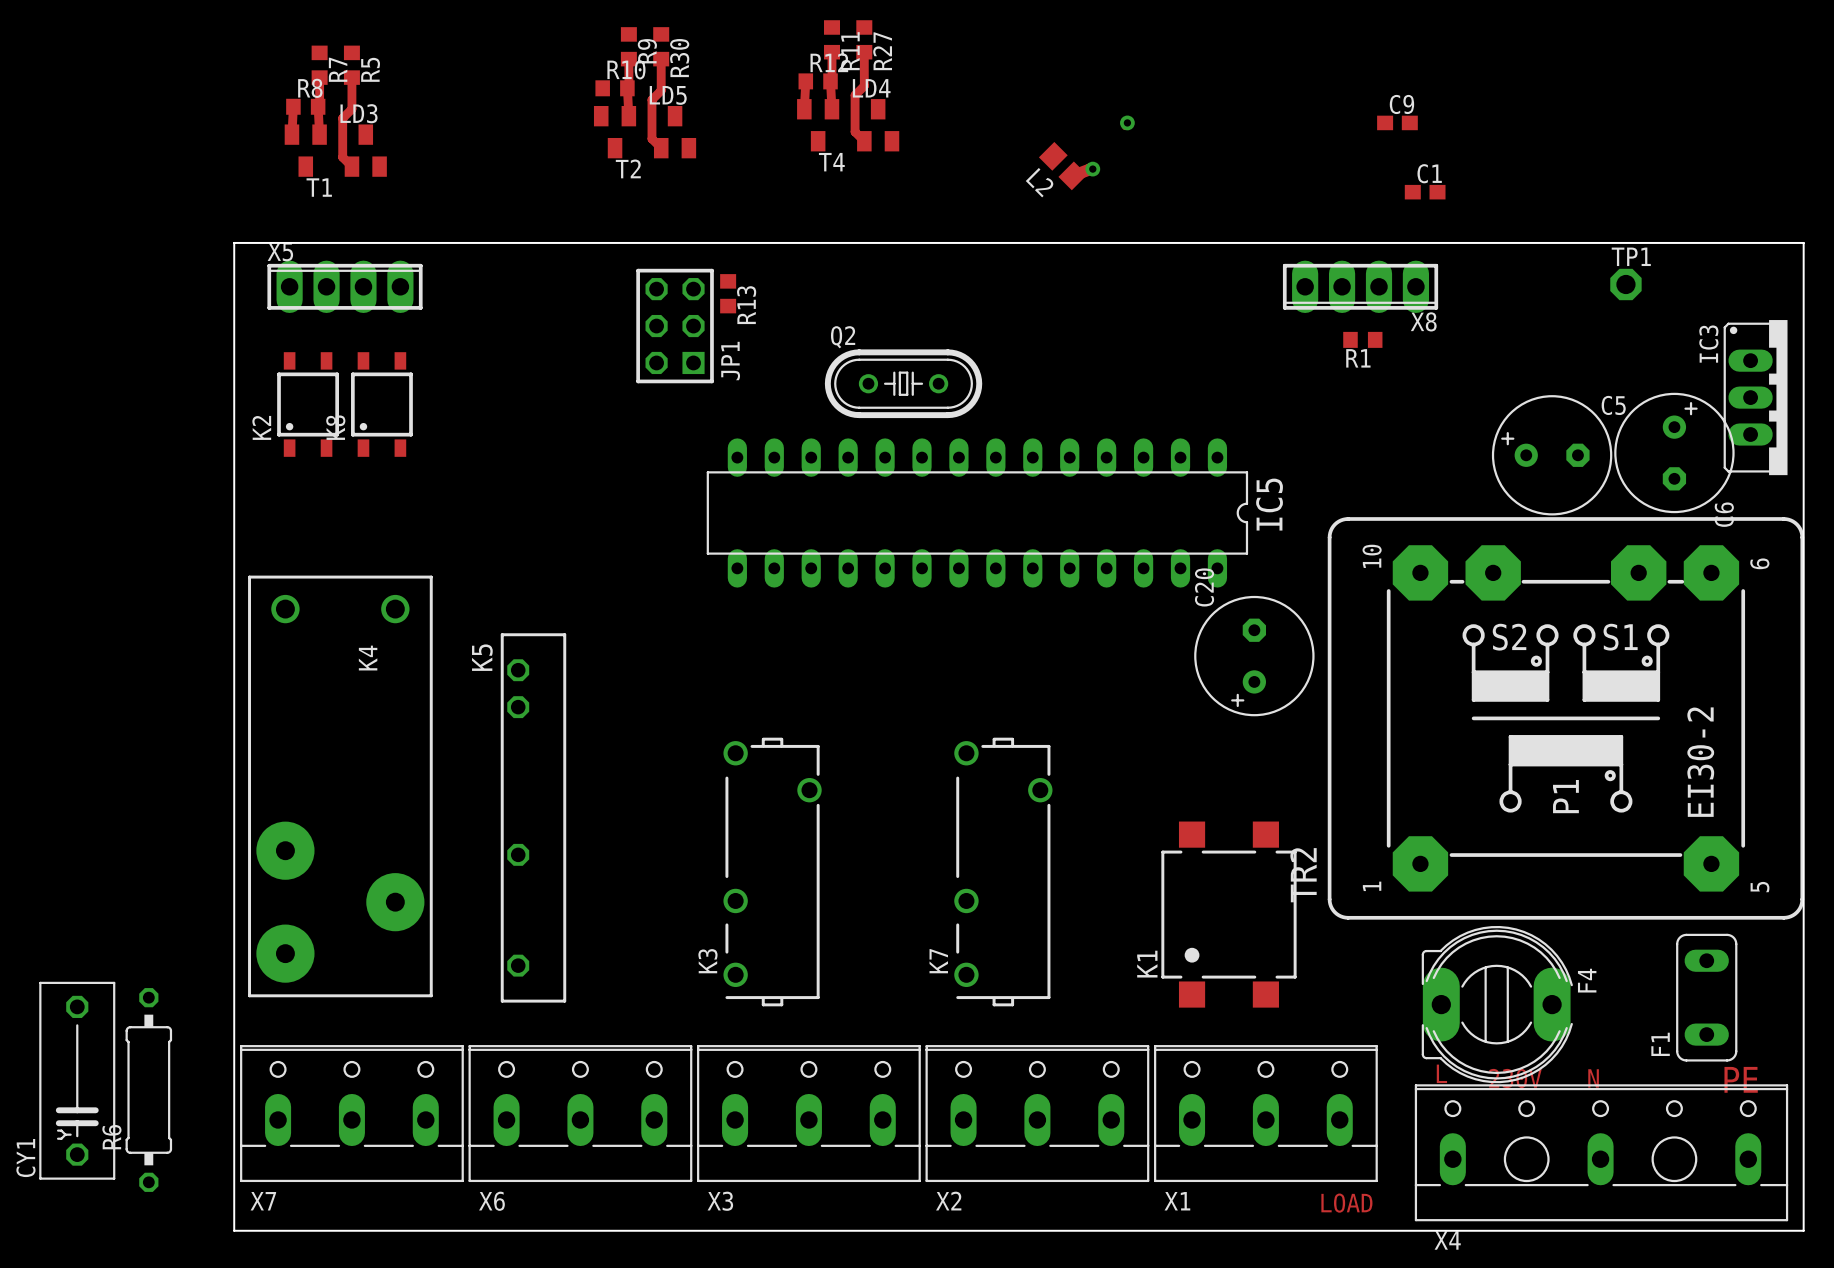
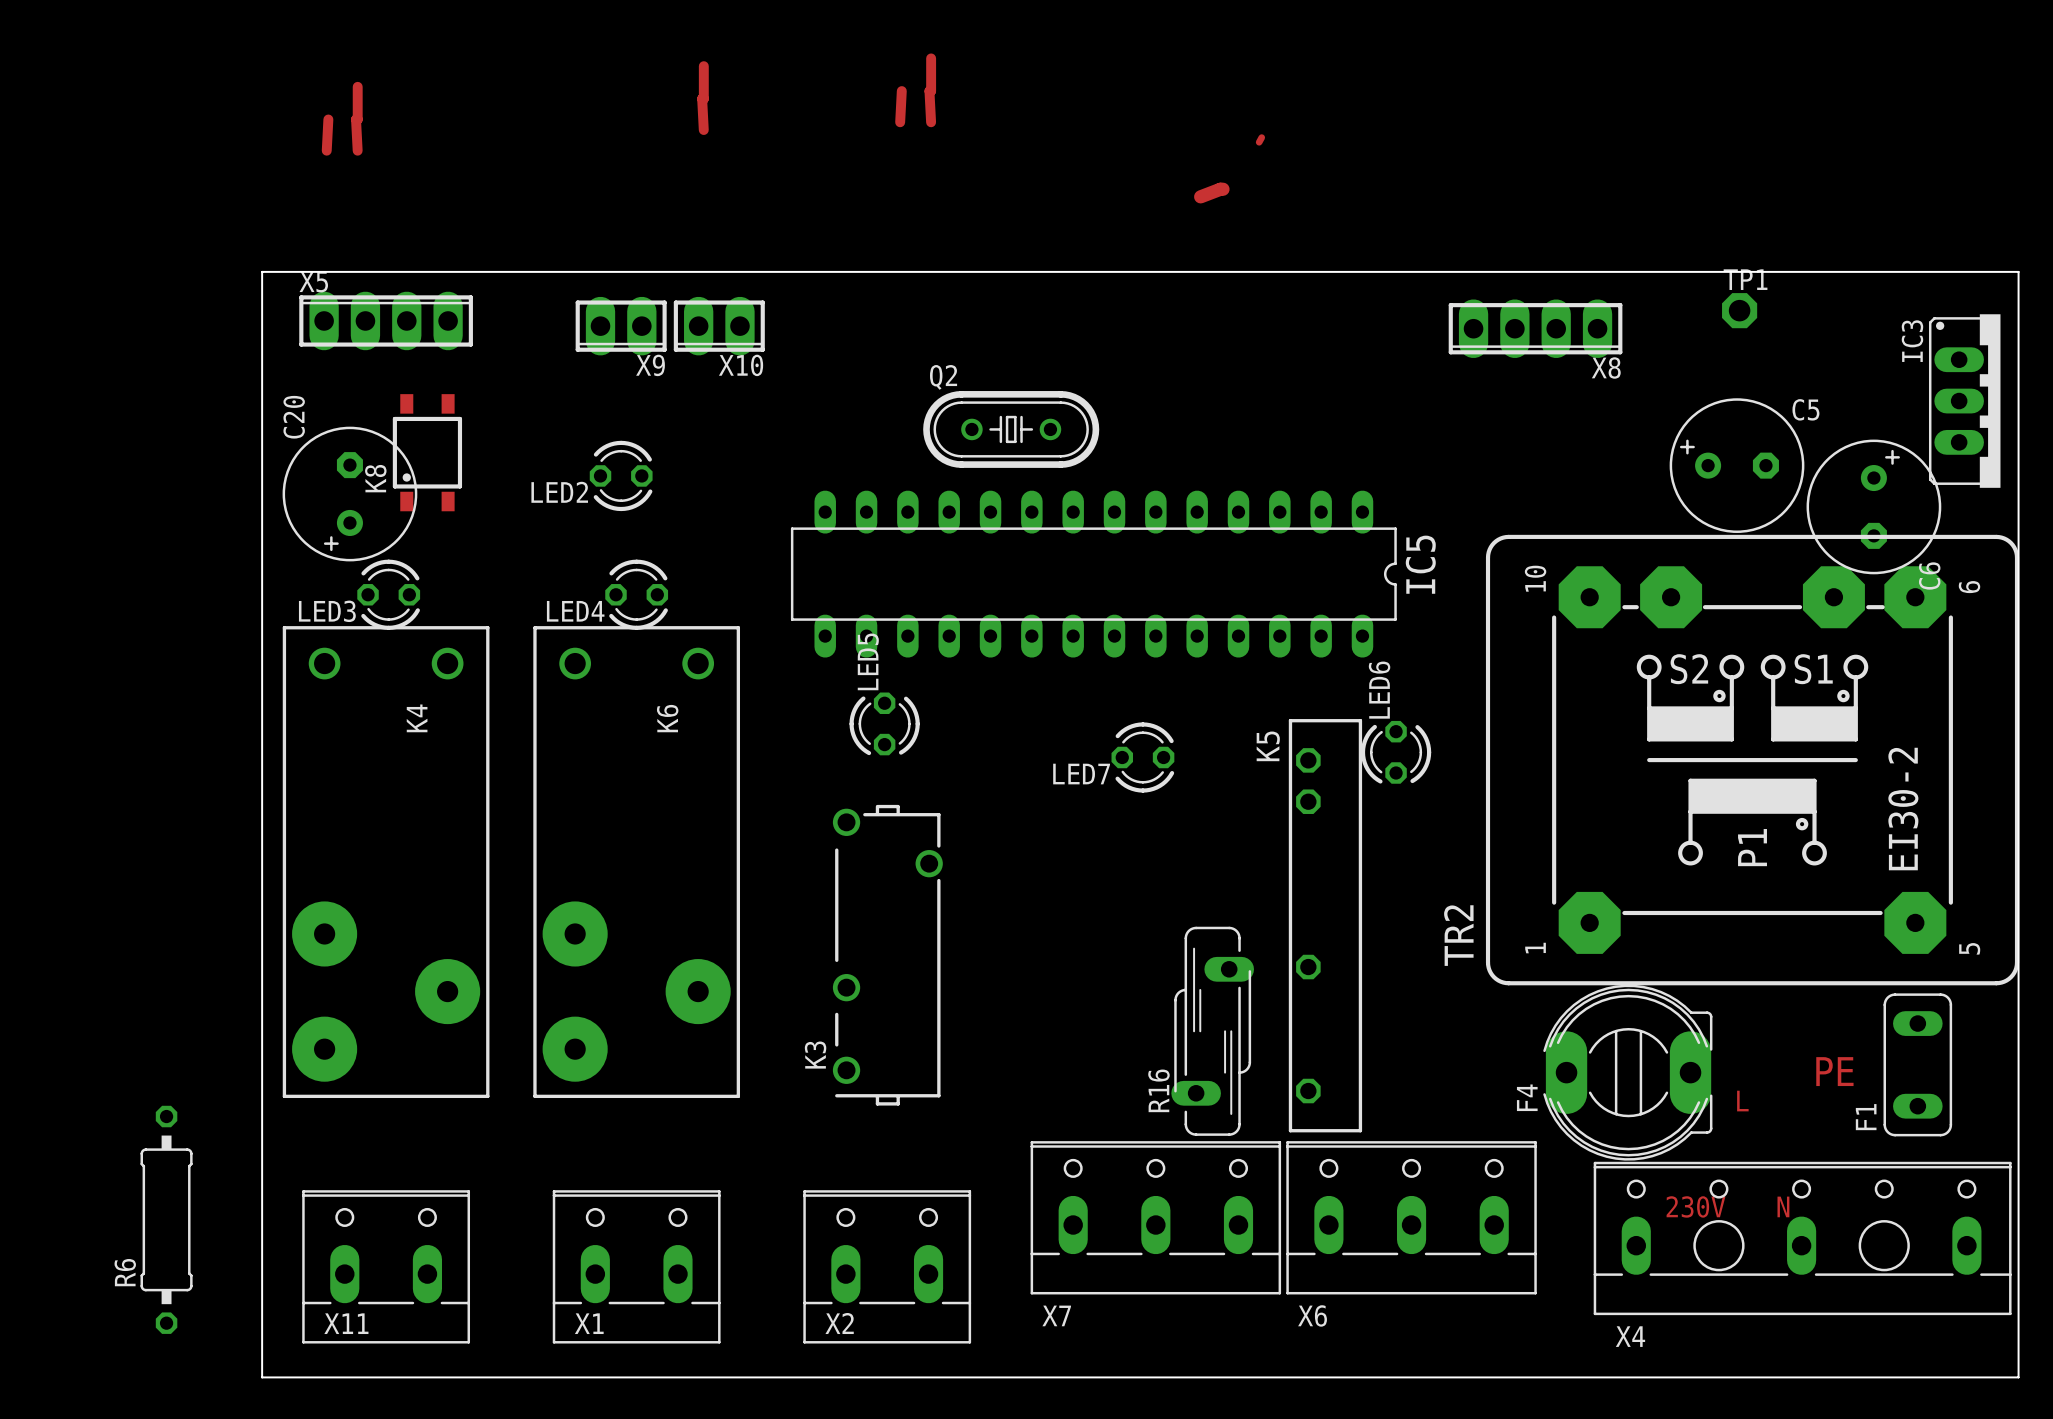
R11: (832, 39) -> none
R27: (864, 39) -> none
R9: (628, 46) -> none
R30: (661, 46) -> none
track: (864, 52) (864, 86) (855, 95) (855, 131) (864, 141) -> none
track: (661, 59) (661, 90) (651, 99) (651, 138) (661, 148) -> none
R7: (319, 65) -> none
R5: (351, 65) -> none
track: (351, 77) (351, 109) (342, 118) (342, 157) (351, 166) -> none
R12: (818, 81) -> none
R10: (615, 88) -> none
R8: (305, 106) -> none
via: (1127, 122) -> none
C9: (1397, 122) -> none
T4: (818, 125) -> none
LD4: (878, 125) -> none
T2: (615, 132) -> none
LD5: (675, 132) -> none
T1: (305, 150) -> none
LD3: (365, 150) -> none
L2: (1063, 166) -> none
via: (1092, 169) -> none
C1: (1425, 192) -> none
TP1 position: (1625, 284) -> (1739, 310)
X8 position: (1360, 286) -> (1535, 328)
X9: none -> (621, 326)
X10: none -> (719, 326)
R13: (728, 293) -> none
JP1: (675, 326) -> none
R1: (1362, 339) -> none
IC3 position: (1755, 397) -> (1964, 401)
K2: (308, 404) -> none
LED2: none -> (621, 475)
C5 position: (1552, 455) -> (1737, 465)
LED3: none -> (388, 594)
LED4: none -> (636, 594)
C20 footprint: [1194, 595, 1315, 717] -> [282, 426, 418, 562]
LED5: none -> (884, 723)
LED6: none -> (1396, 752)
LED7: none -> (1142, 757)
TR2 position: (1565, 718) -> (1752, 760)
K6: none -> (636, 862)
K4 position: (340, 786) -> (386, 862)
K5 position: (533, 817) -> (1325, 925)
K3 position: (772, 872) -> (887, 955)
K7: (1003, 872) -> none
K1: (1228, 914) -> none
R16: none -> (1212, 1031)
F1 position: (1706, 997) -> (1917, 1064)
F4 rotation: 0° (1497, 1004) -> 180° (1627, 1072)
X2 footprint: [925, 1045, 1150, 1183] -> [803, 1190, 972, 1344]
X1 footprint: [1154, 1045, 1378, 1183] -> [552, 1190, 721, 1344]
text position: L (1441, 1073) -> L (1742, 1101)
text position: PE (1741, 1079) -> PE (1834, 1071)
CY1: (77, 1080) -> none
X7 position: (351, 1113) -> (1155, 1217)
X6 position: (580, 1113) -> (1411, 1217)
X3: (808, 1113) -> none
X11: none -> (386, 1266)
X4 position: (1601, 1152) -> (1802, 1238)
X2 name position: X2 (948, 1201) -> X2 (839, 1323)
X1 name position: X1 (1177, 1201) -> X1 (589, 1323)
text: LOAD (1346, 1203) -> none

